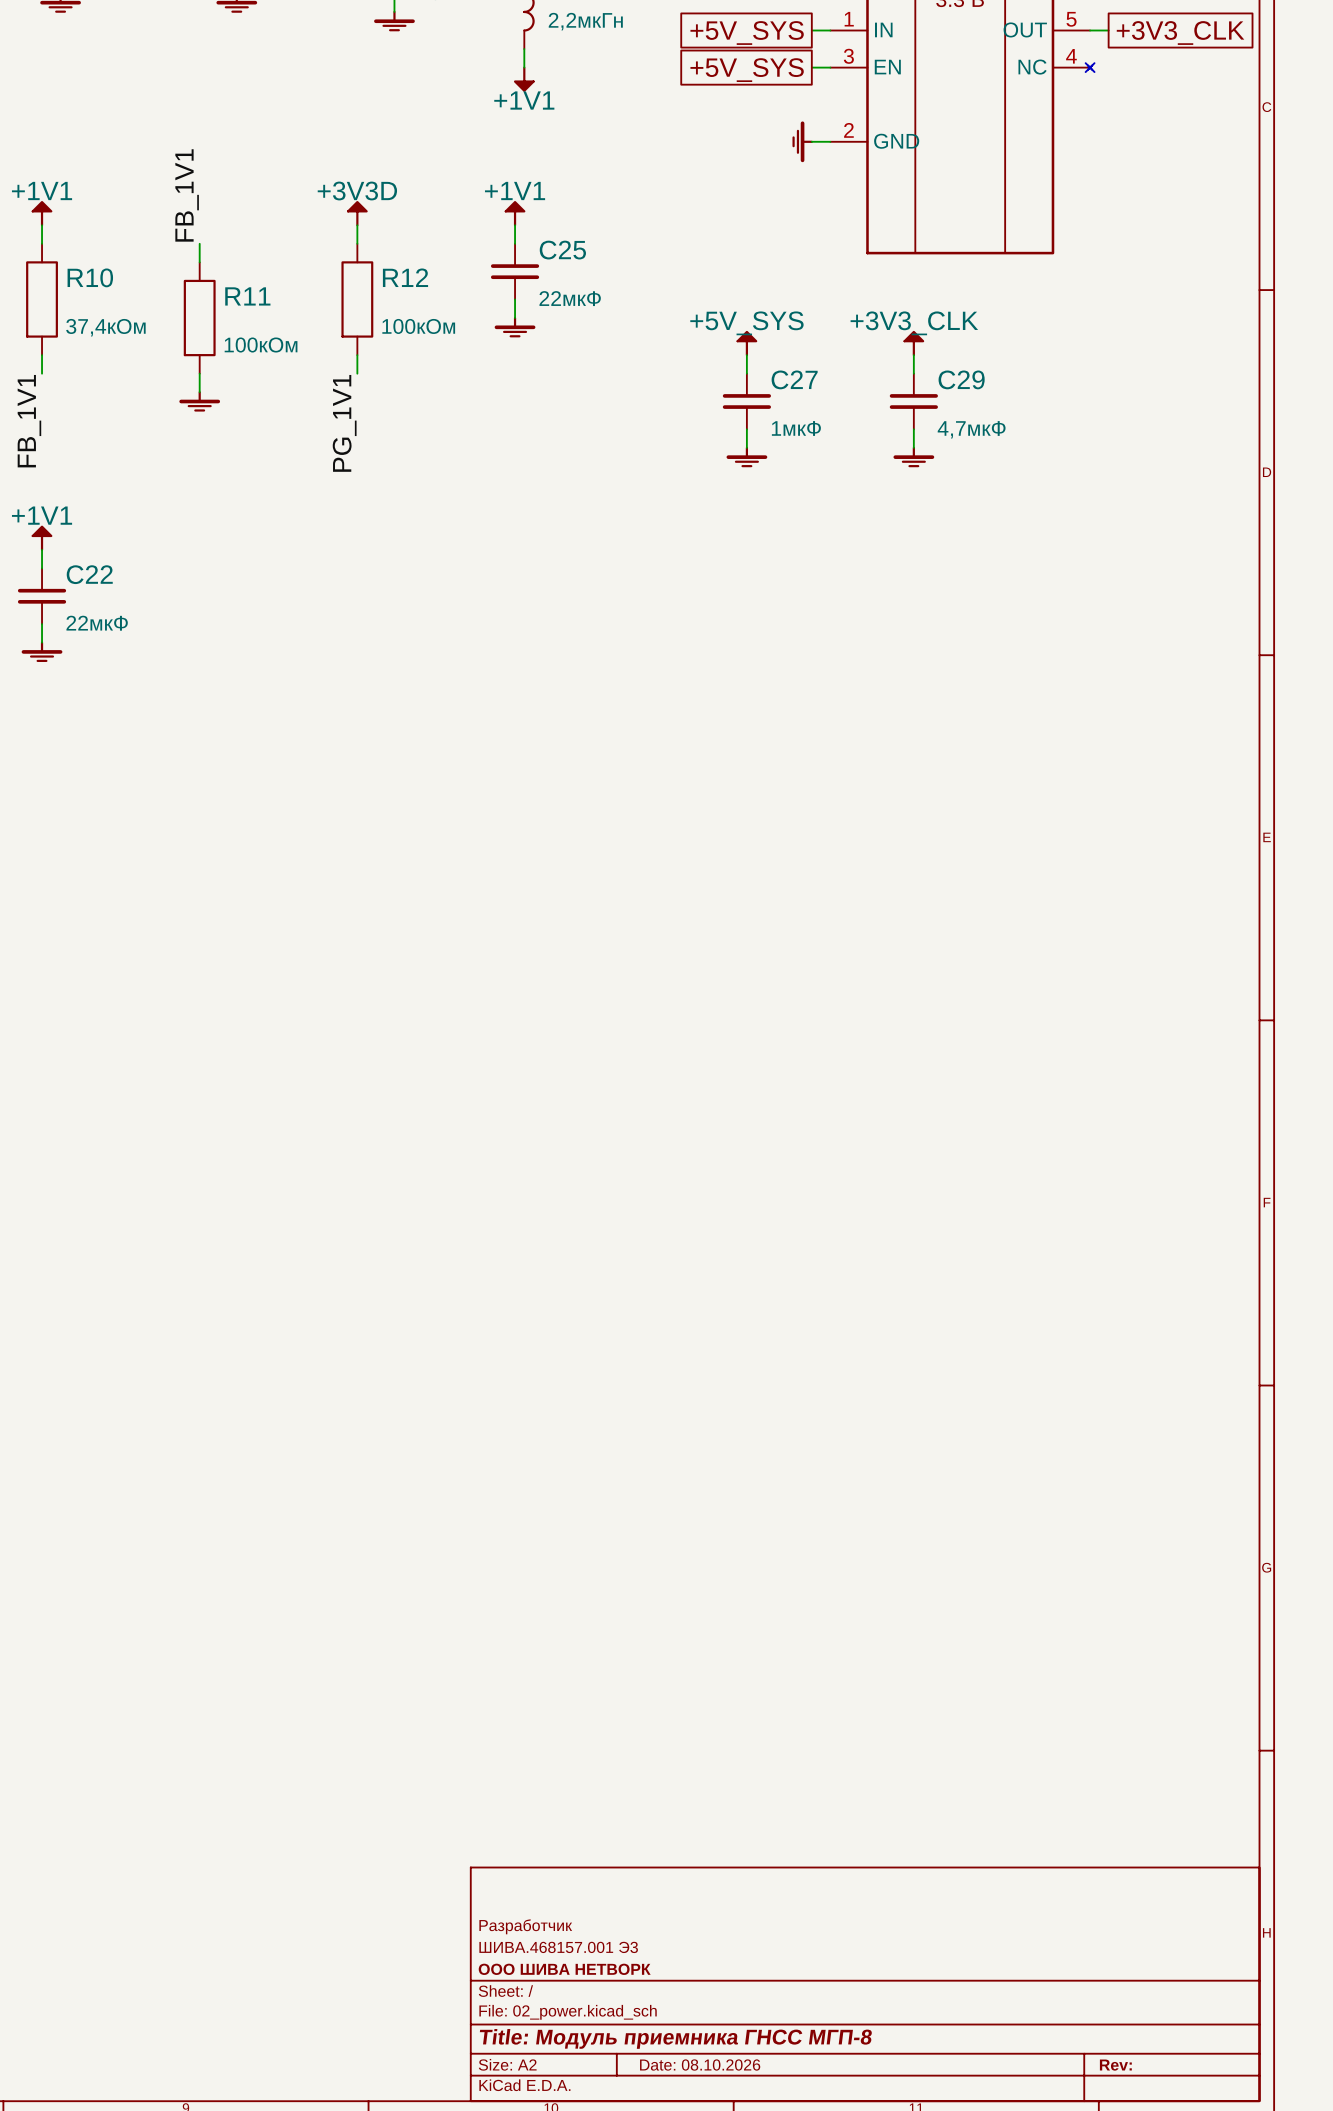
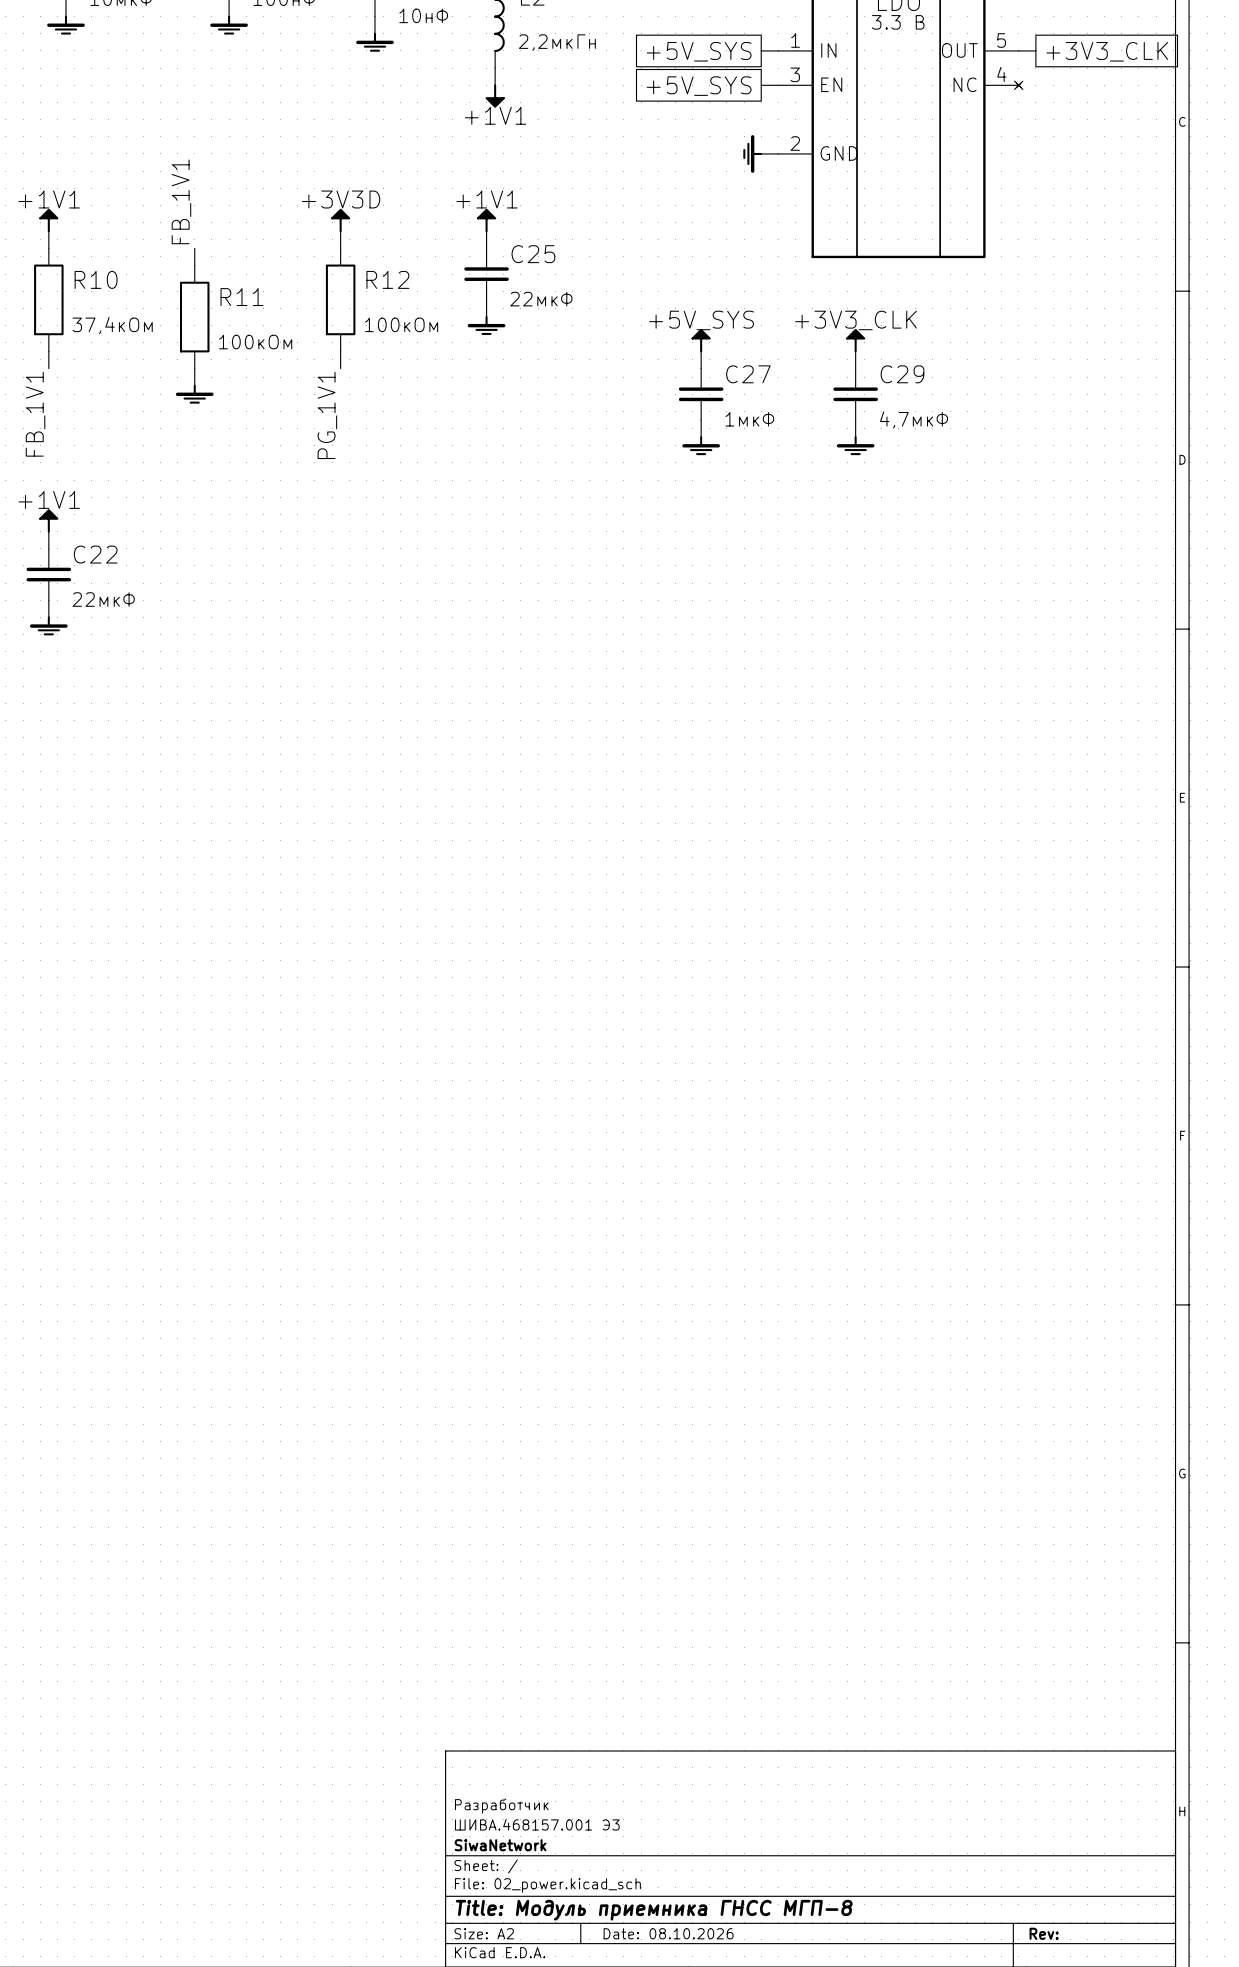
title block: ООО ШИВА НЕТВОРК (564, 1969) -> SiwaNetwork (500, 1845)

